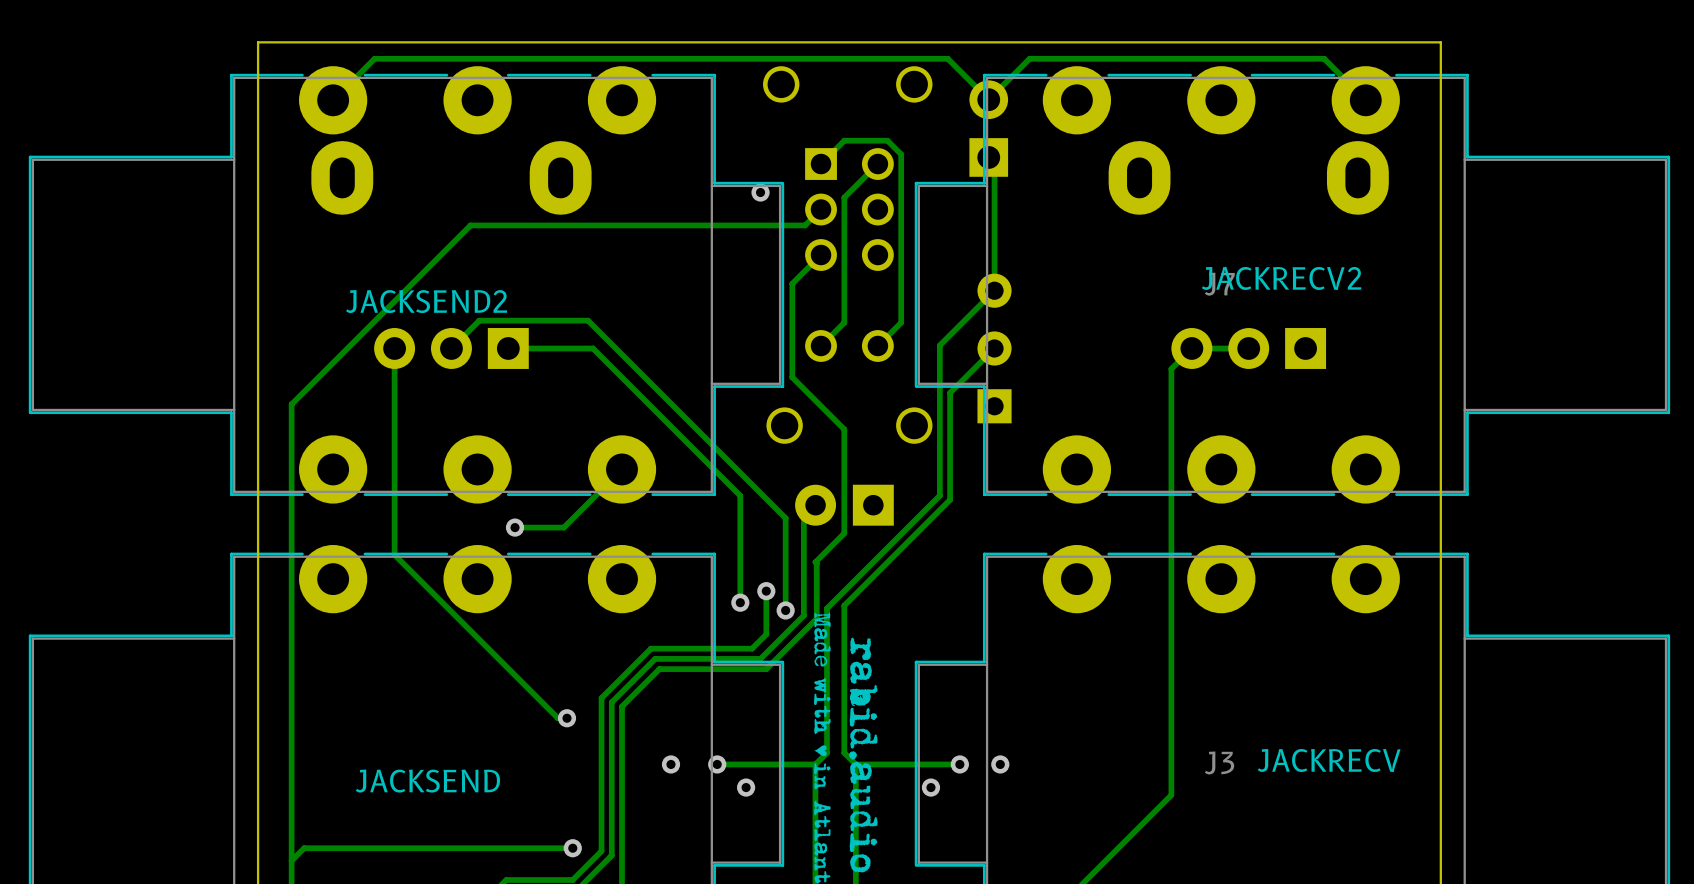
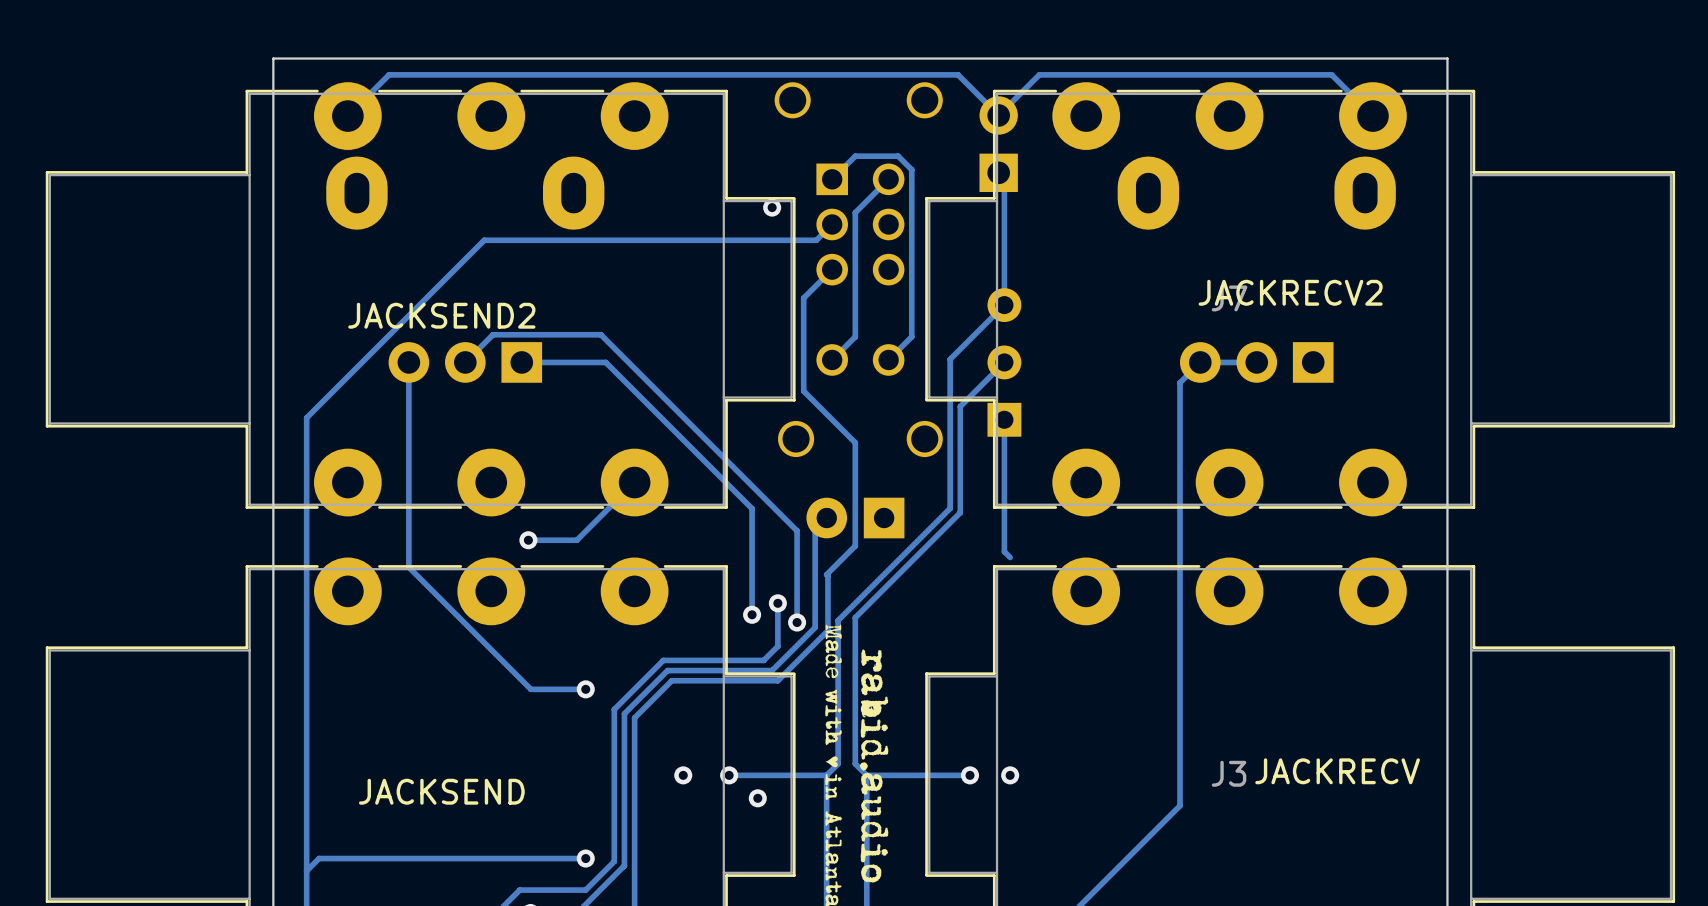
track: none -> (1004, 419) (1004, 551) (1010, 557)
track: (517, 677) (557, 718) (567, 718) -> (530, 689) (585, 689)
via position: (567, 718) -> (585, 689)
via: (930, 787) -> none

